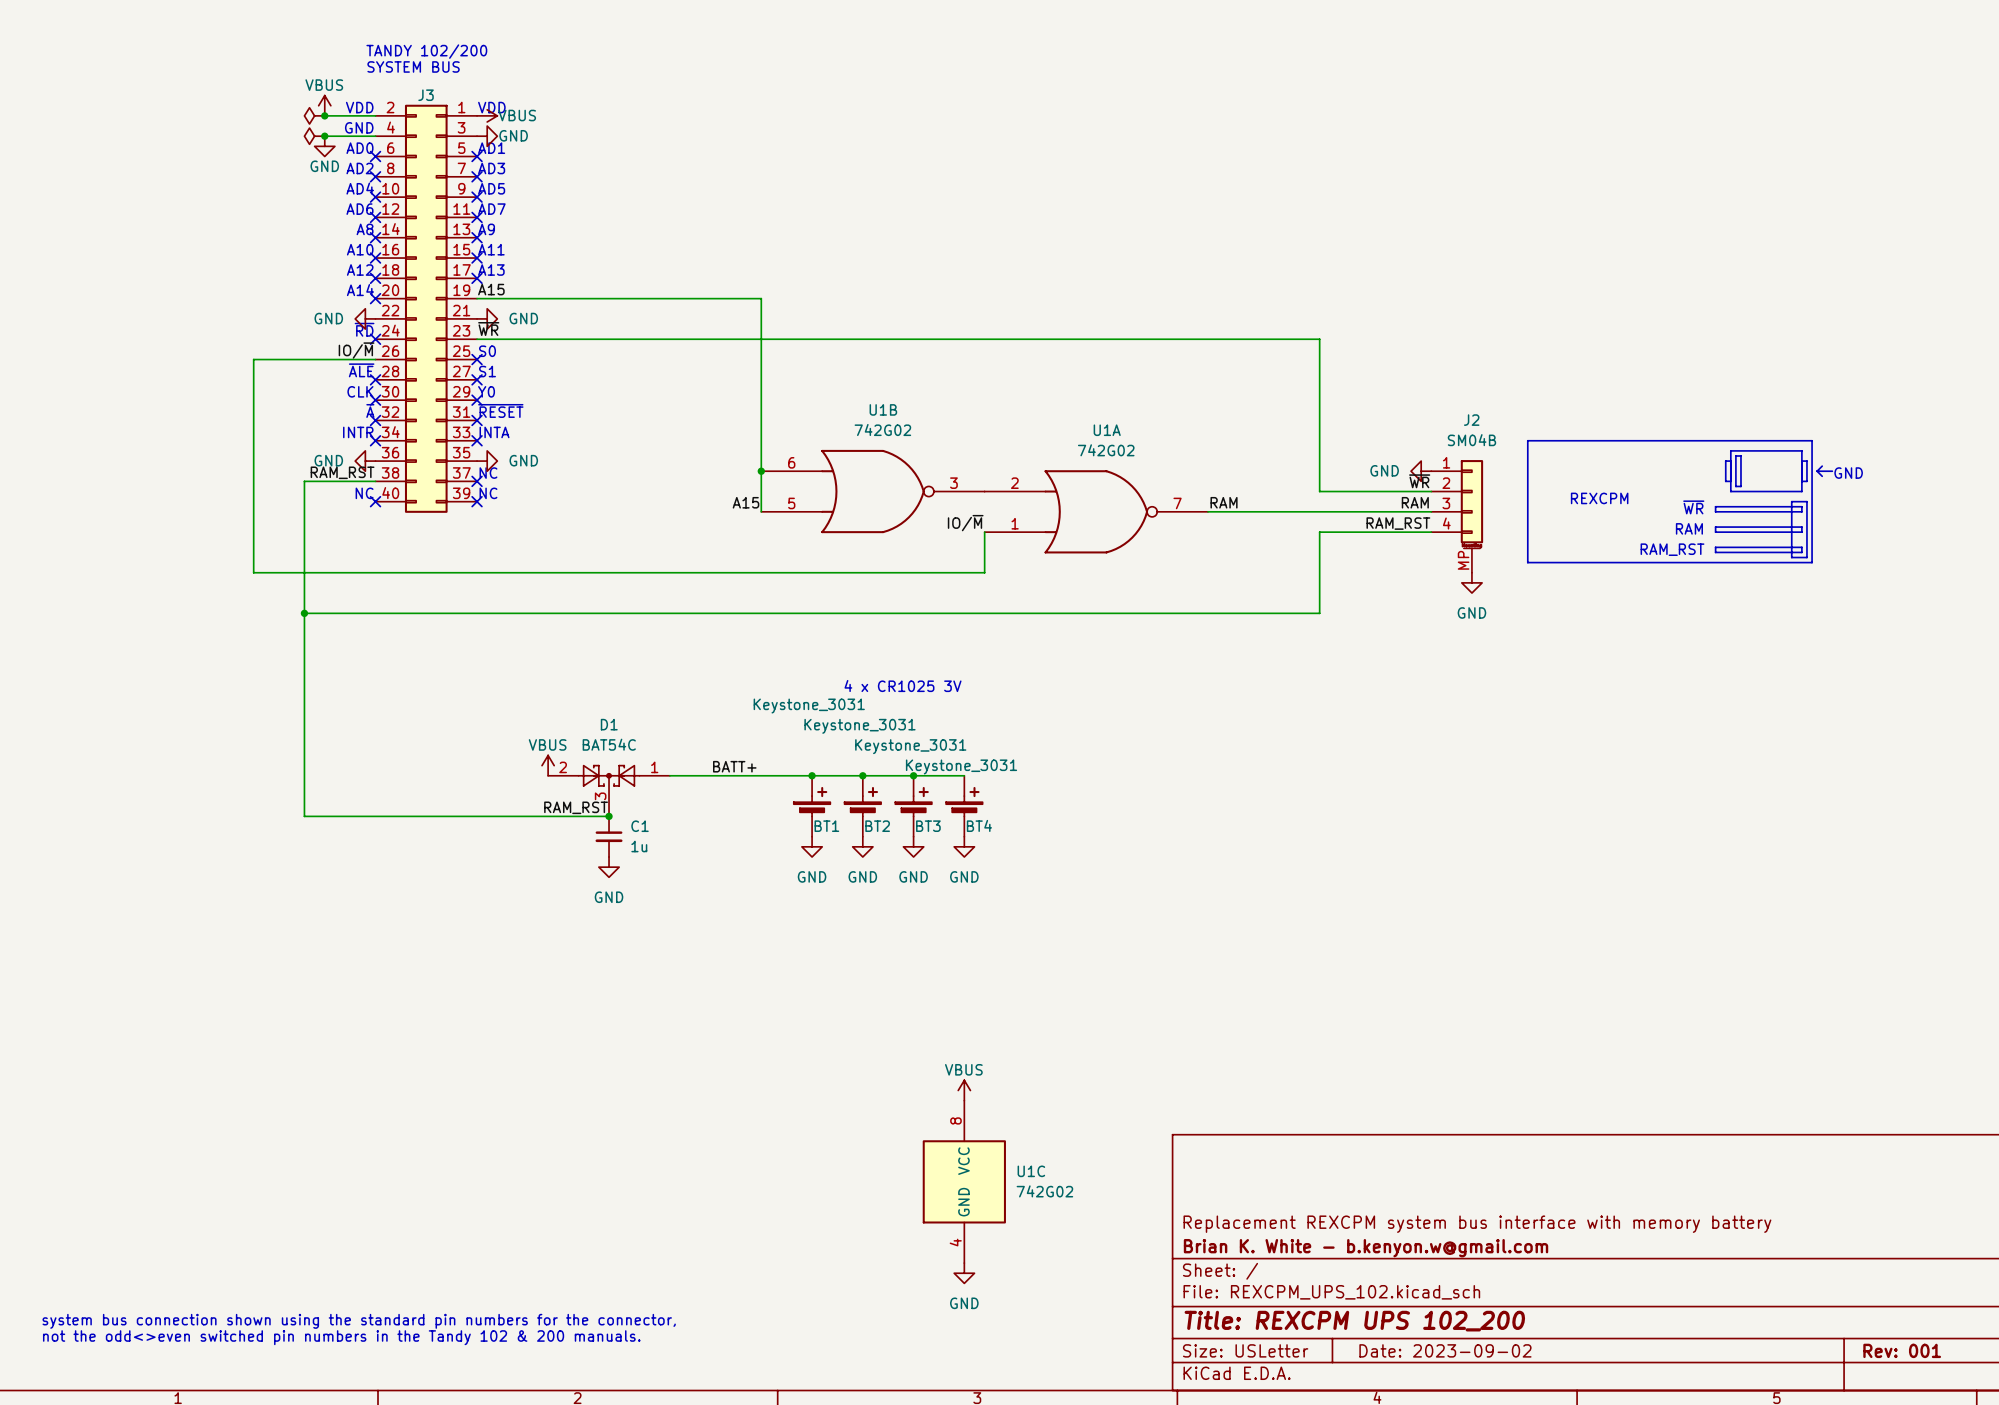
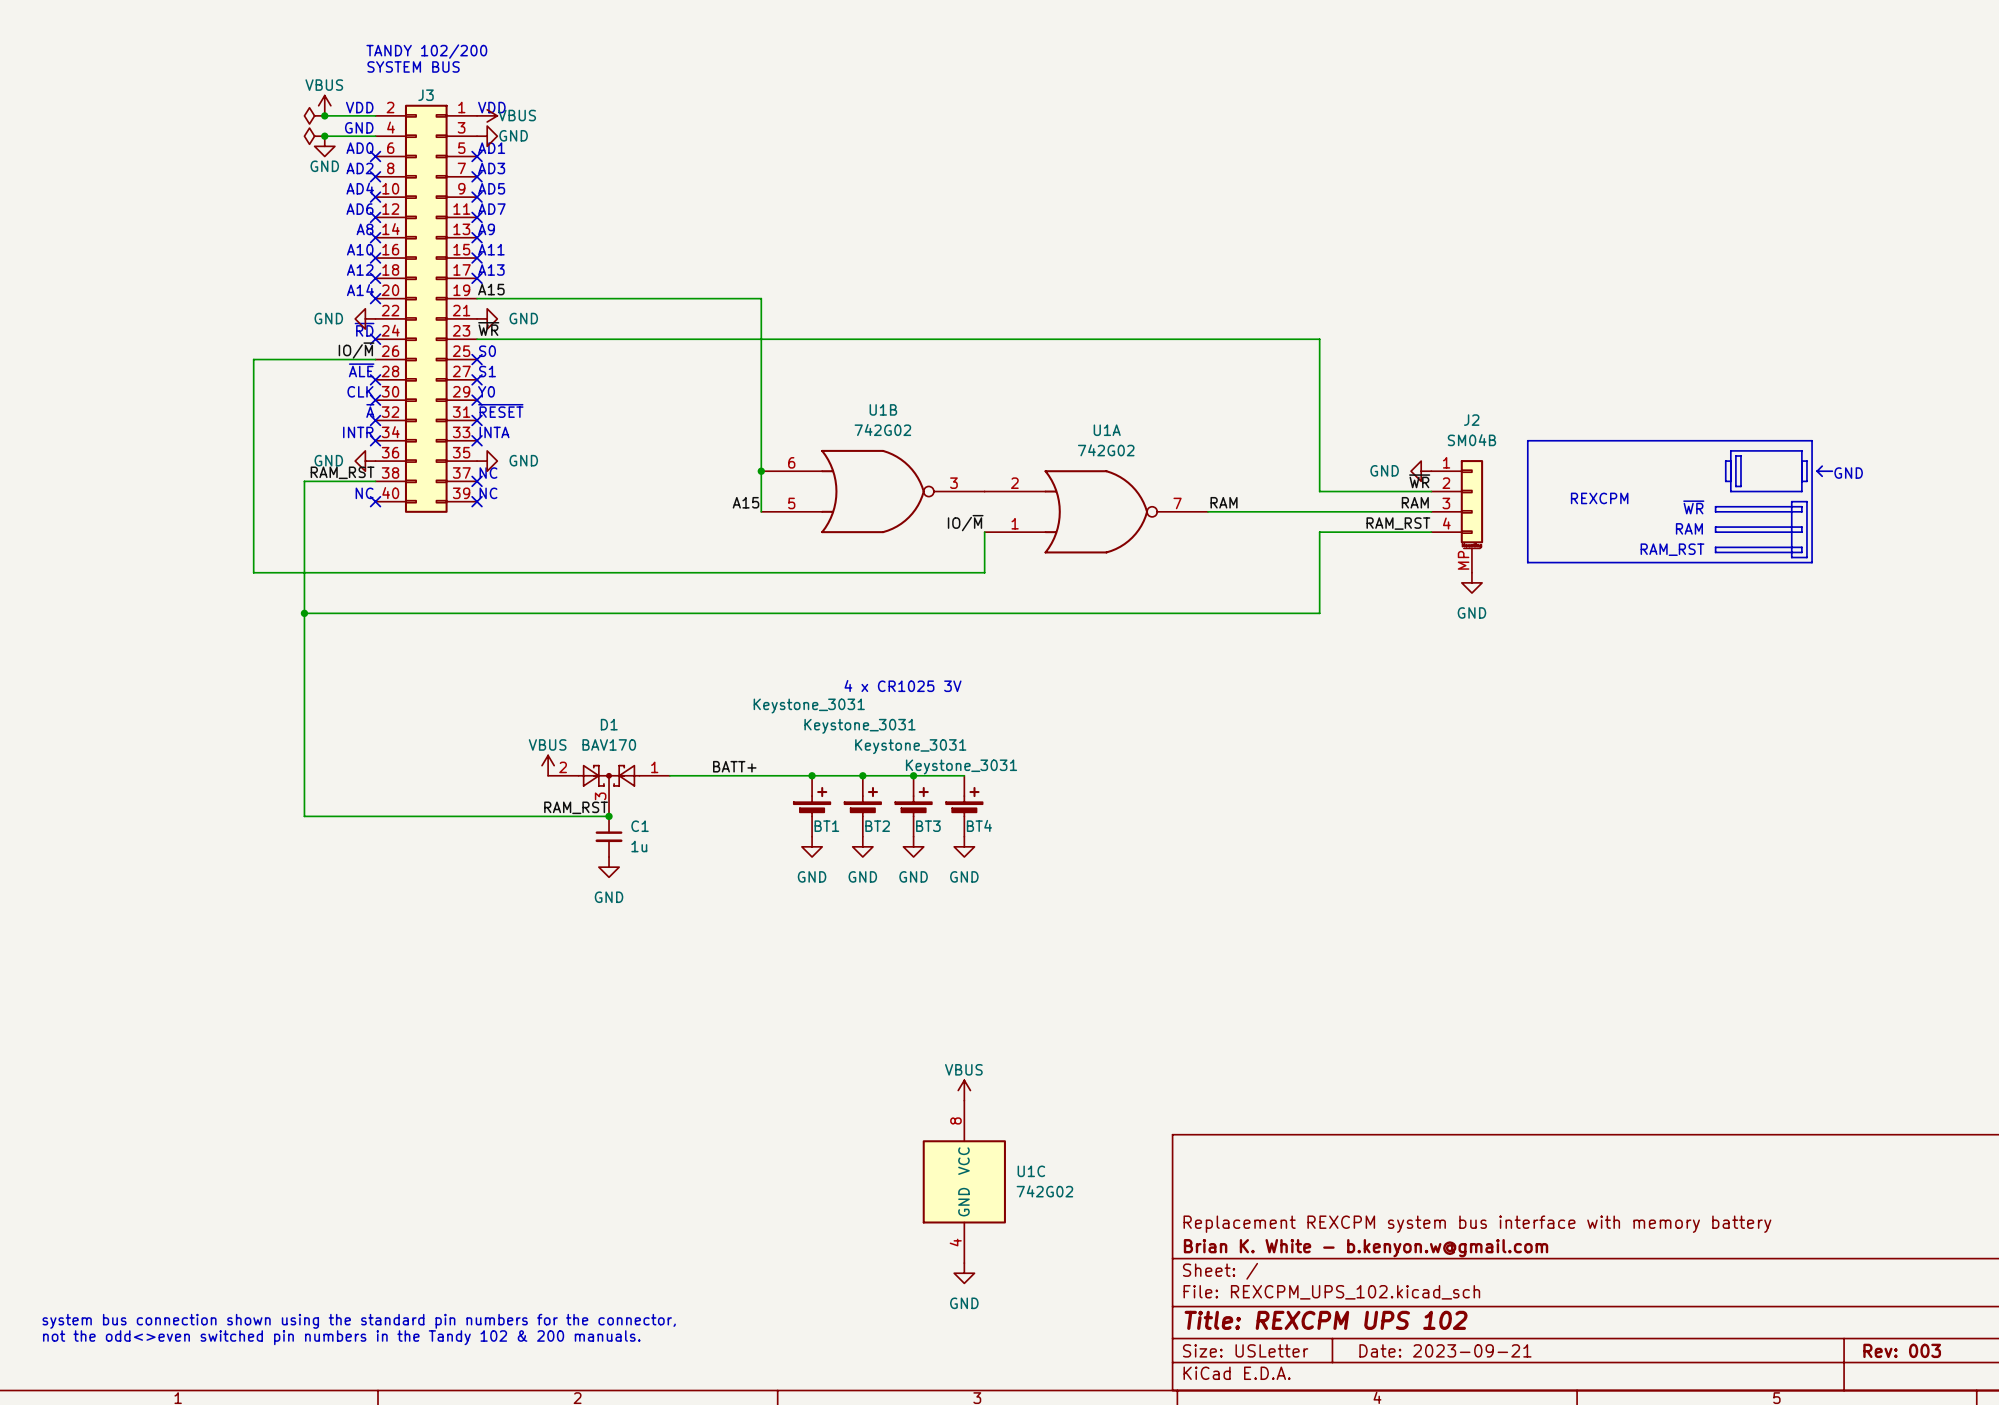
D1 value: BAT54C (609, 744) -> BAV170 (609, 744)
title block: Title: REXCPM UPS 102_200 (1354, 1321) -> Title: REXCPM UPS 102 (1326, 1320)
title block: Date: 2023-09-02 (1445, 1350) -> Date: 2023-09-21 (1445, 1350)
title block: Rev: 001 (1902, 1350) -> Rev: 003 (1902, 1350)

